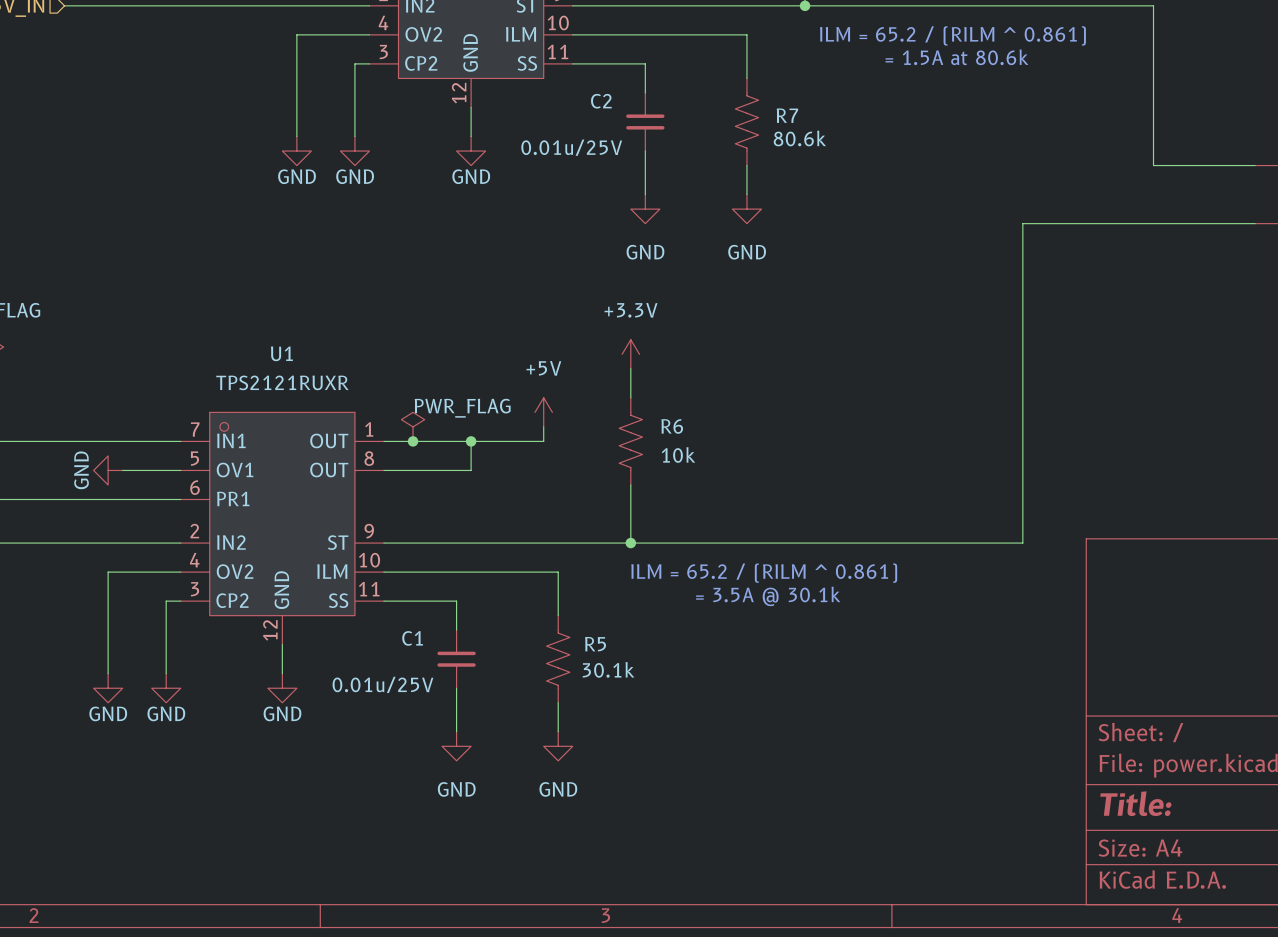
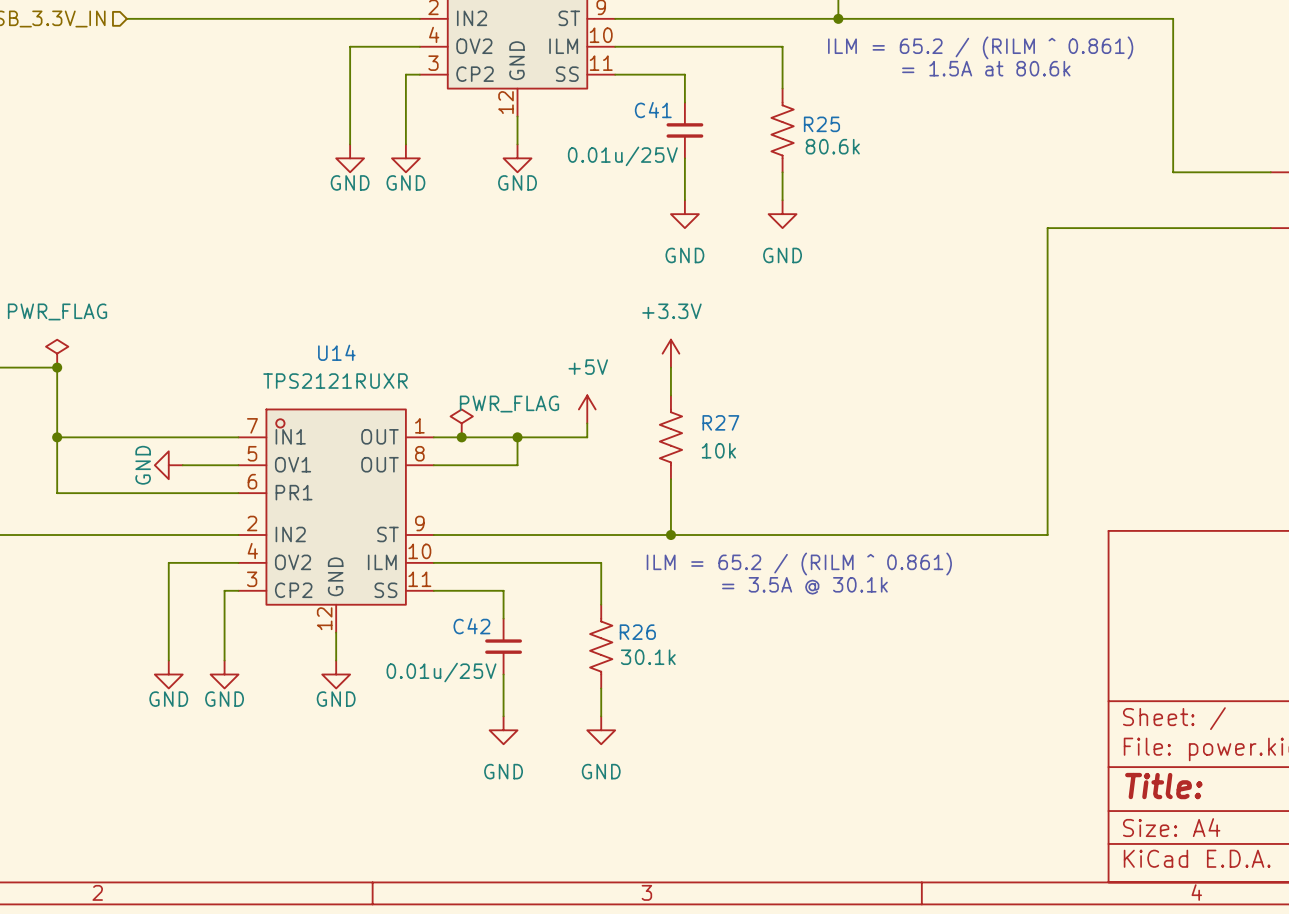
C2 name: C2 (601, 101) -> C41 (653, 110)
R7 name: R7 (787, 115) -> R25 (821, 124)
U1 name: U1 (281, 353) -> U14 (336, 352)
R6 name: R6 (672, 426) -> R27 (720, 422)
C1 name: C1 (412, 638) -> C42 (471, 626)
R5 name: R5 (595, 644) -> R26 (637, 632)

